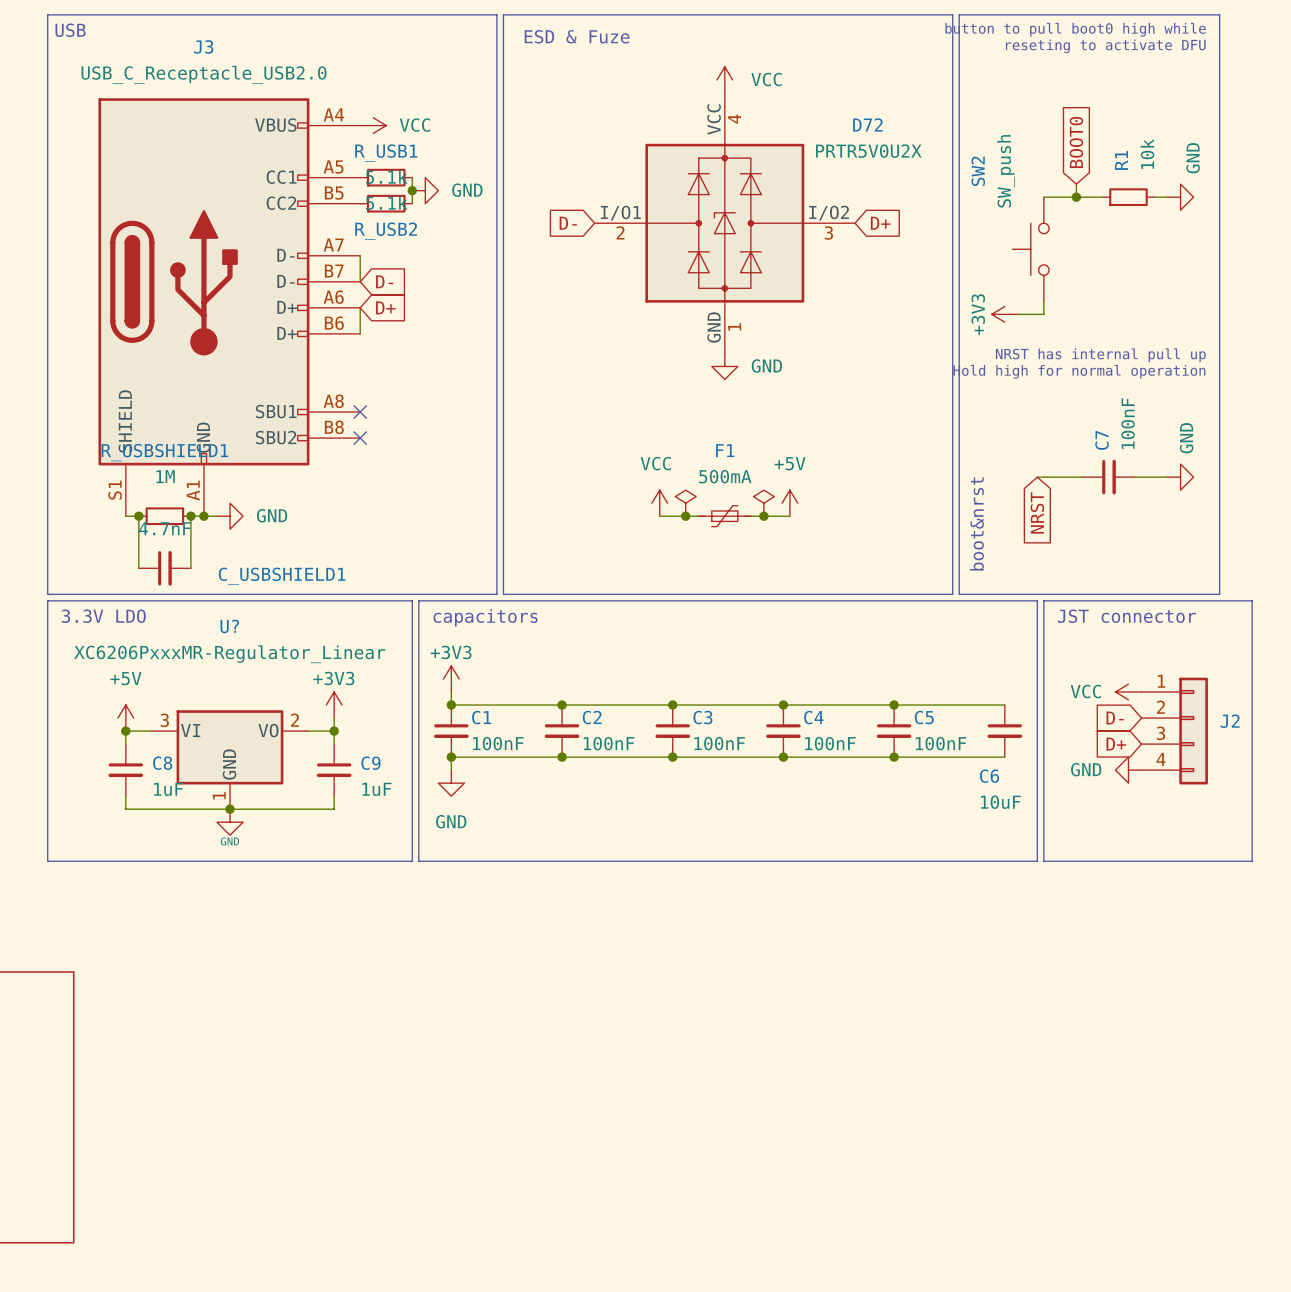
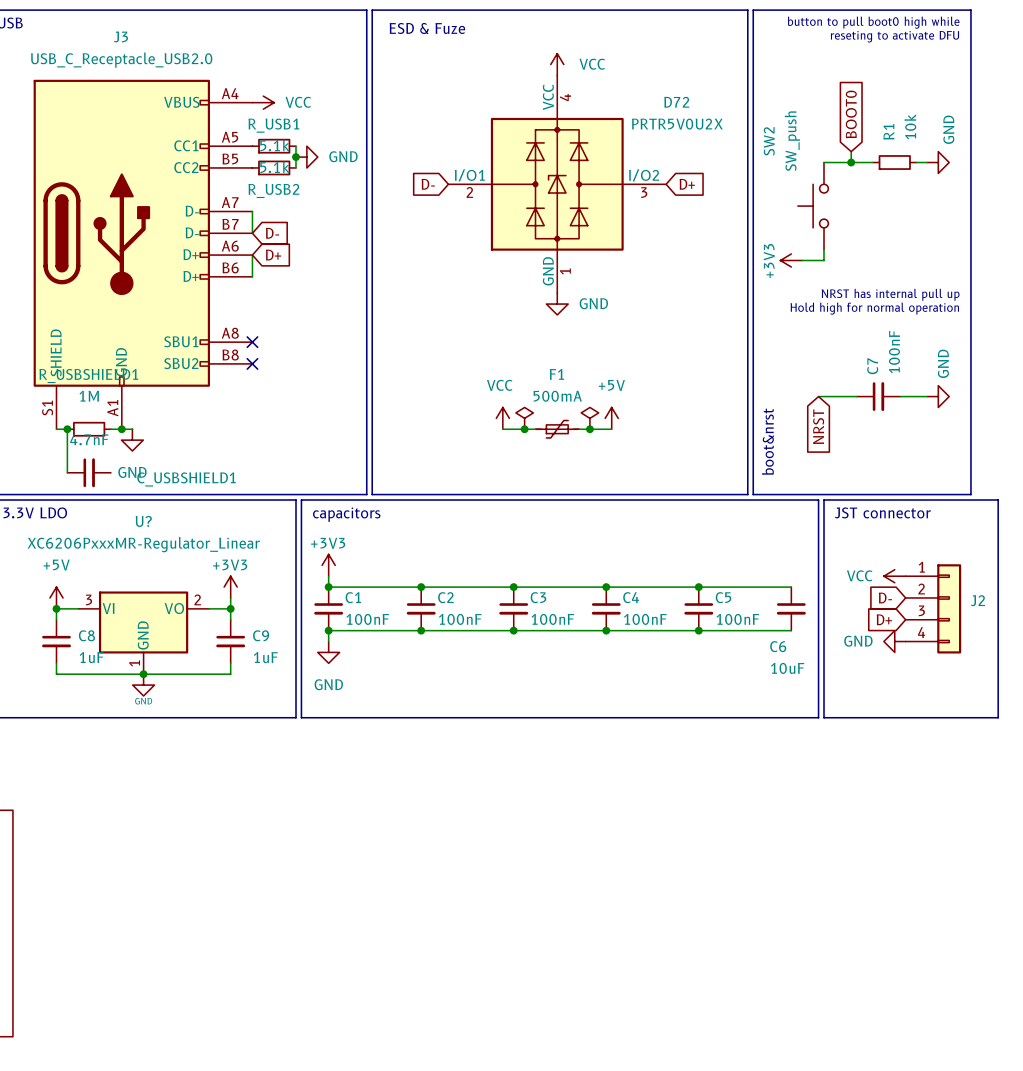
wire: (190, 516) (190, 568) -> none
junction: (190, 516) -> none
power symbol rotation: 0° (229, 516) -> 90° clockwise (132, 440)
power symbol position: GND (229, 516) -> GND (132, 440)

